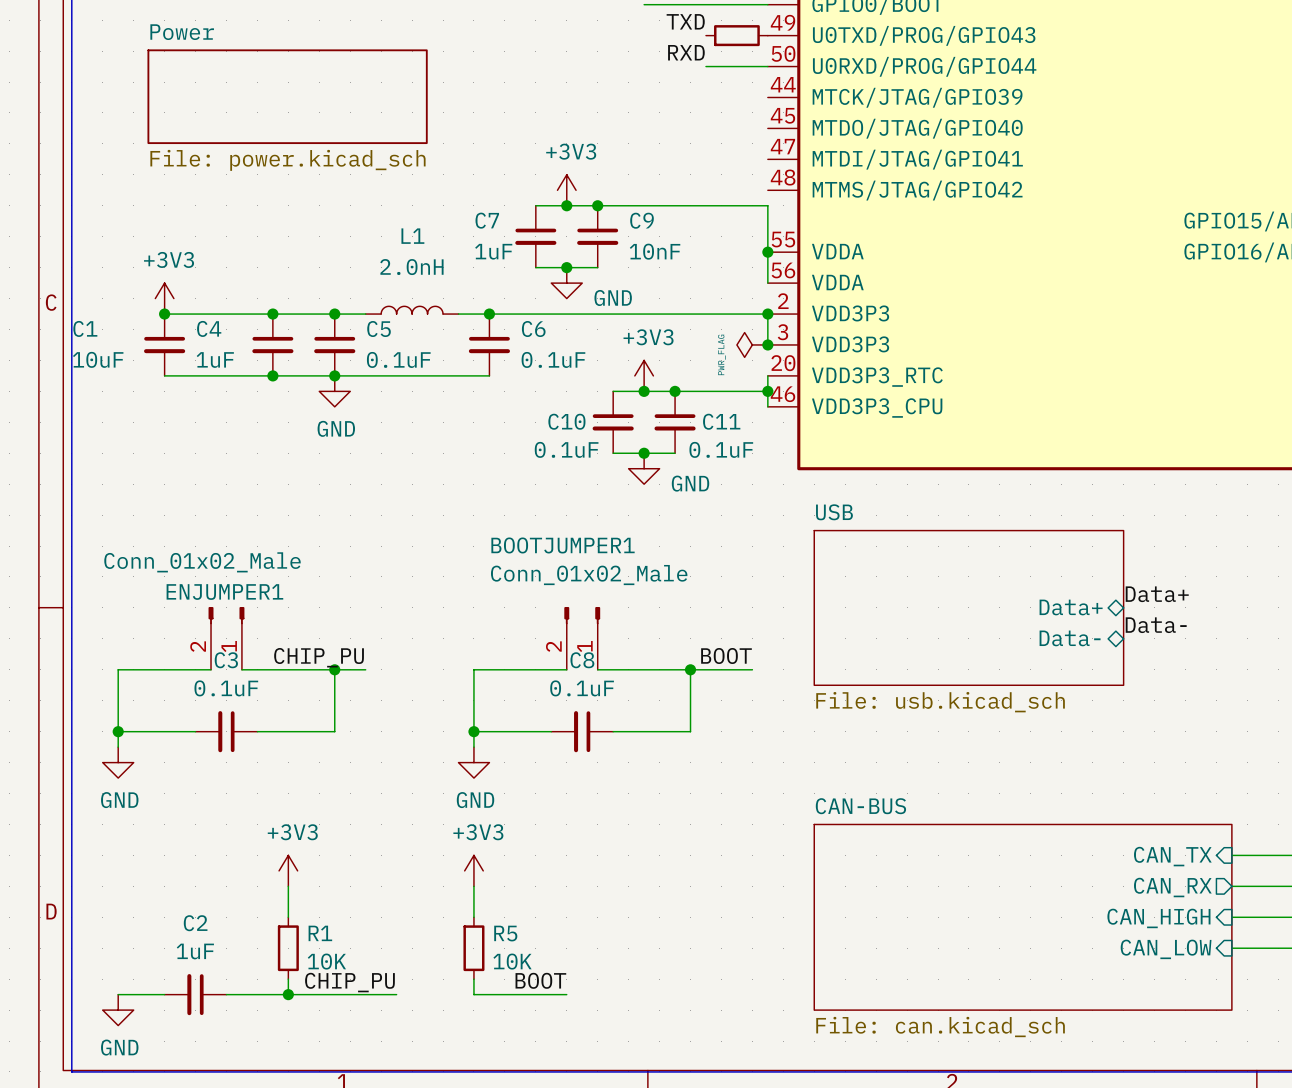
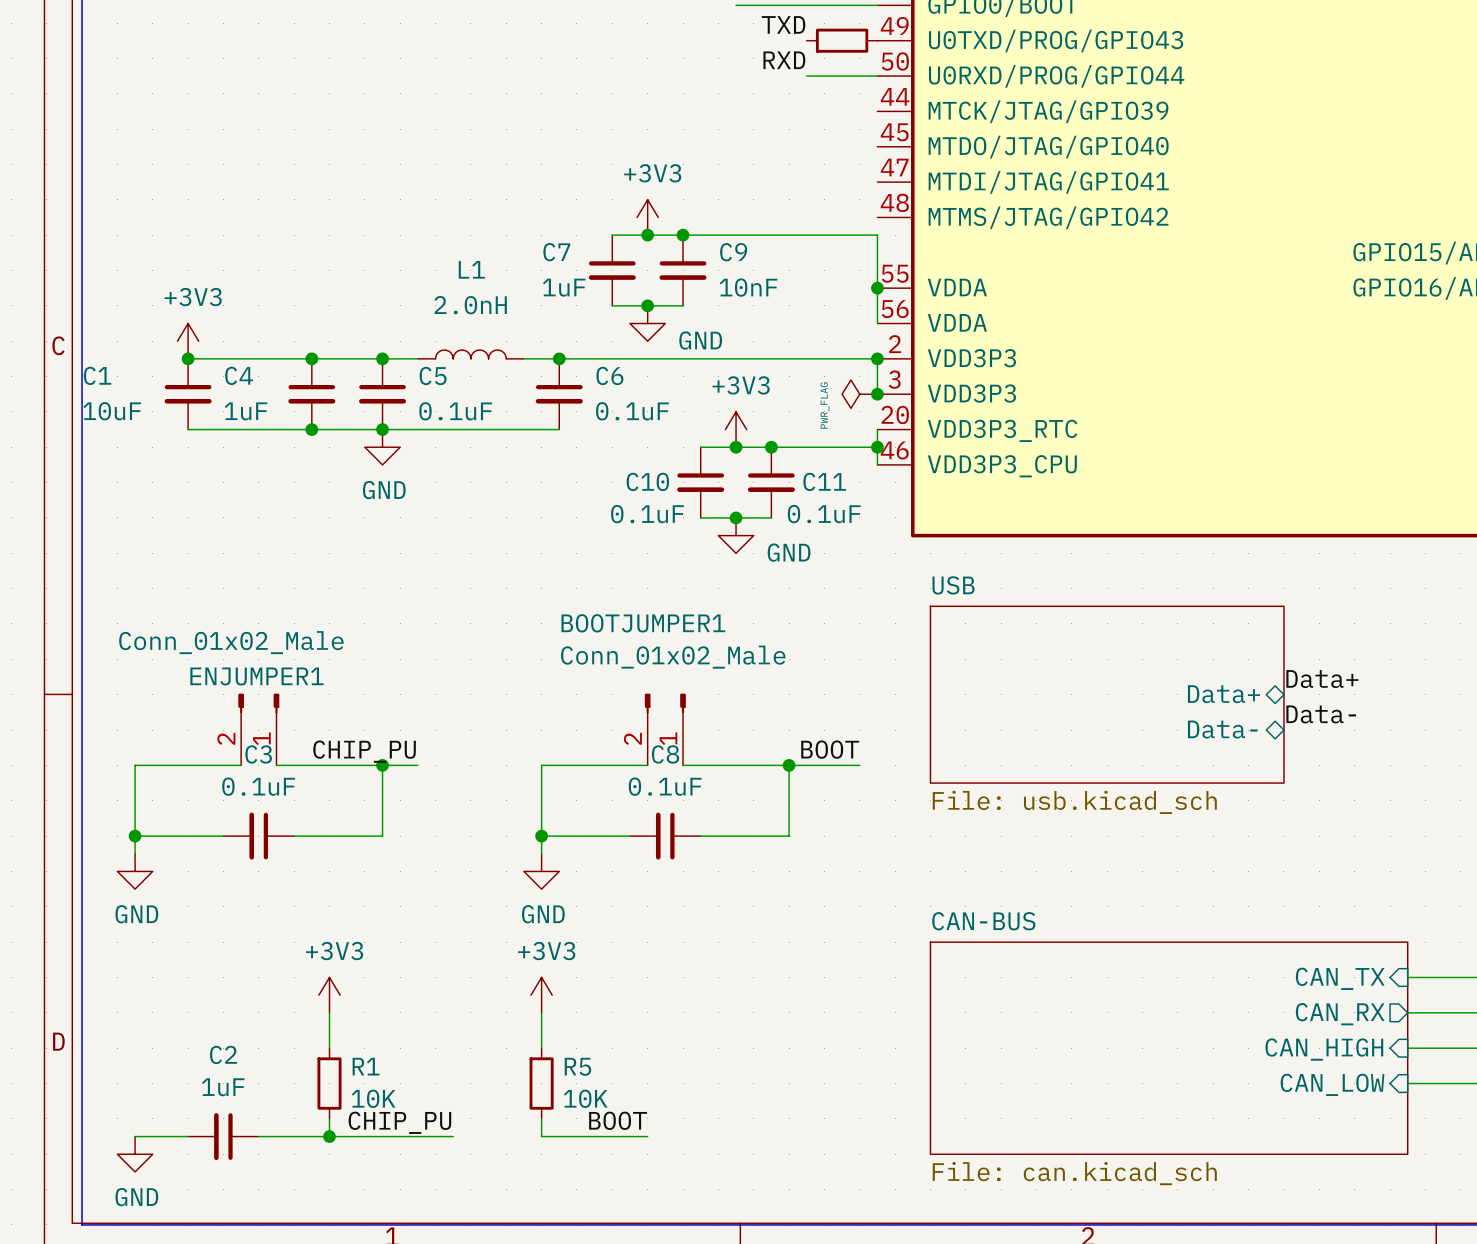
sheet Power: File: power.kicad_sch (287, 96) -> none

